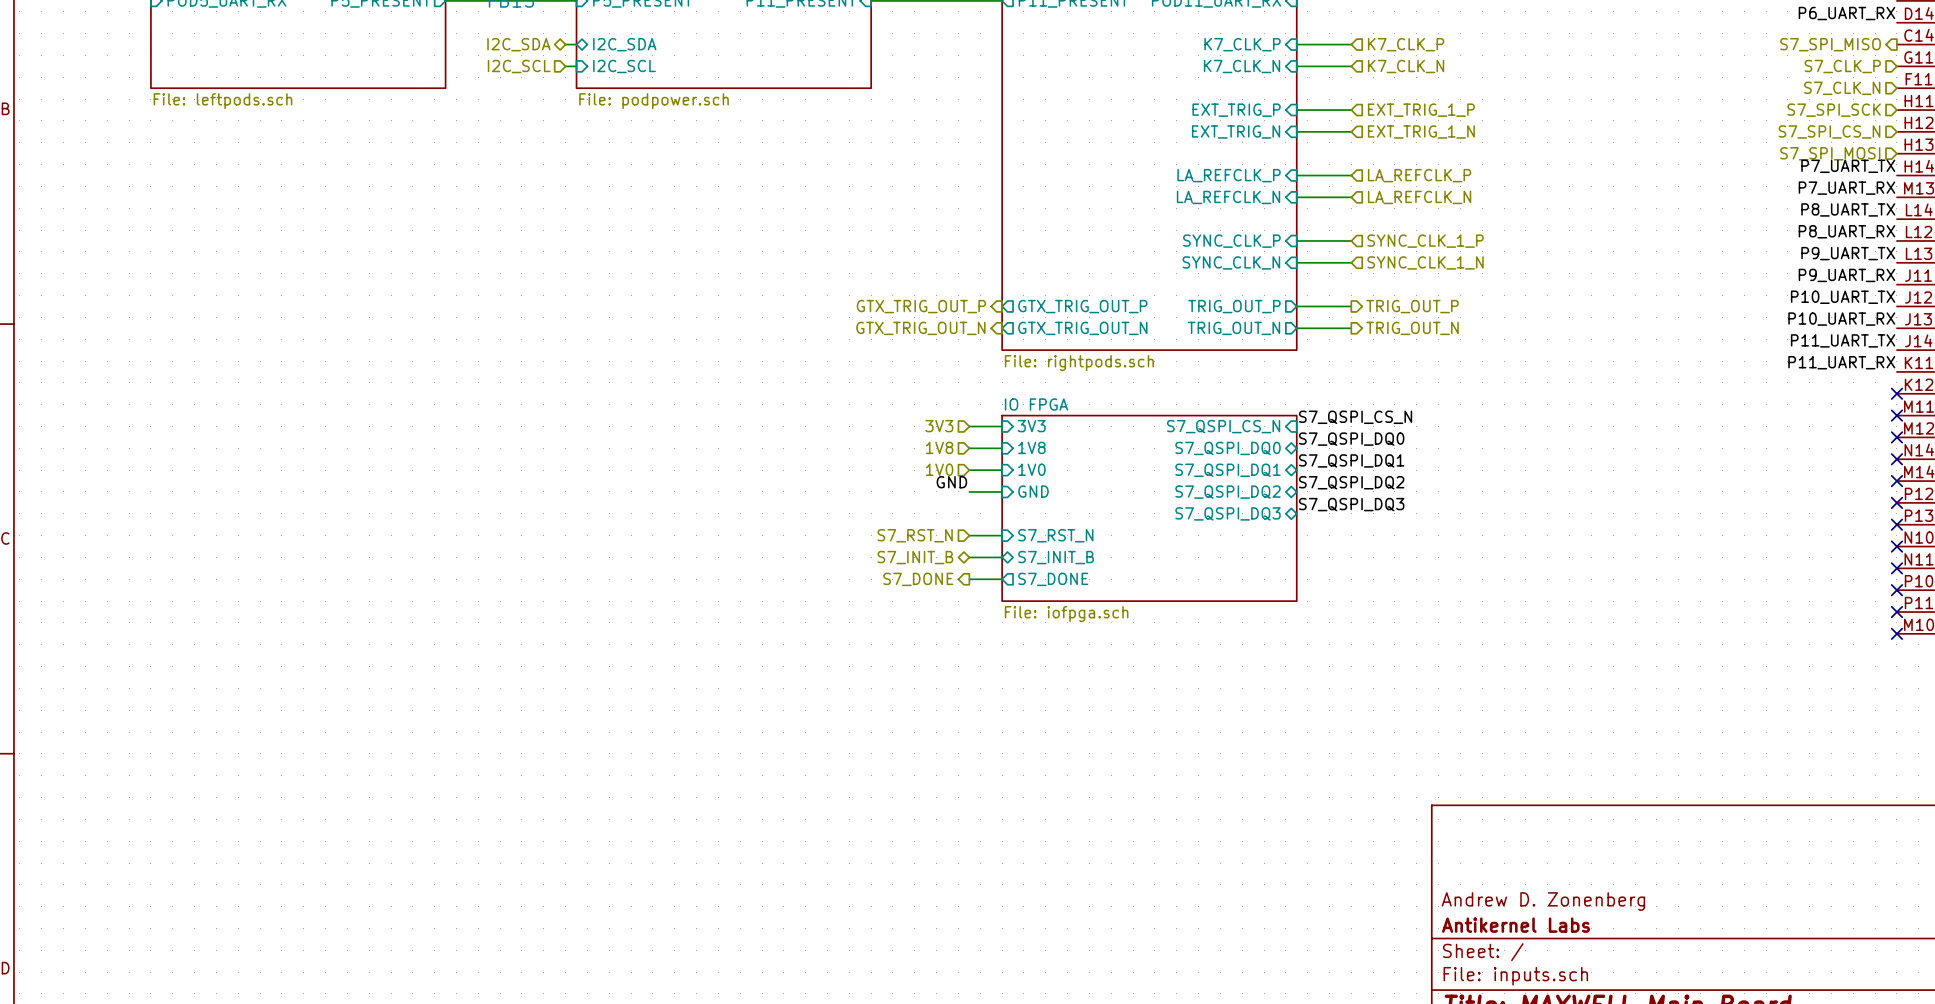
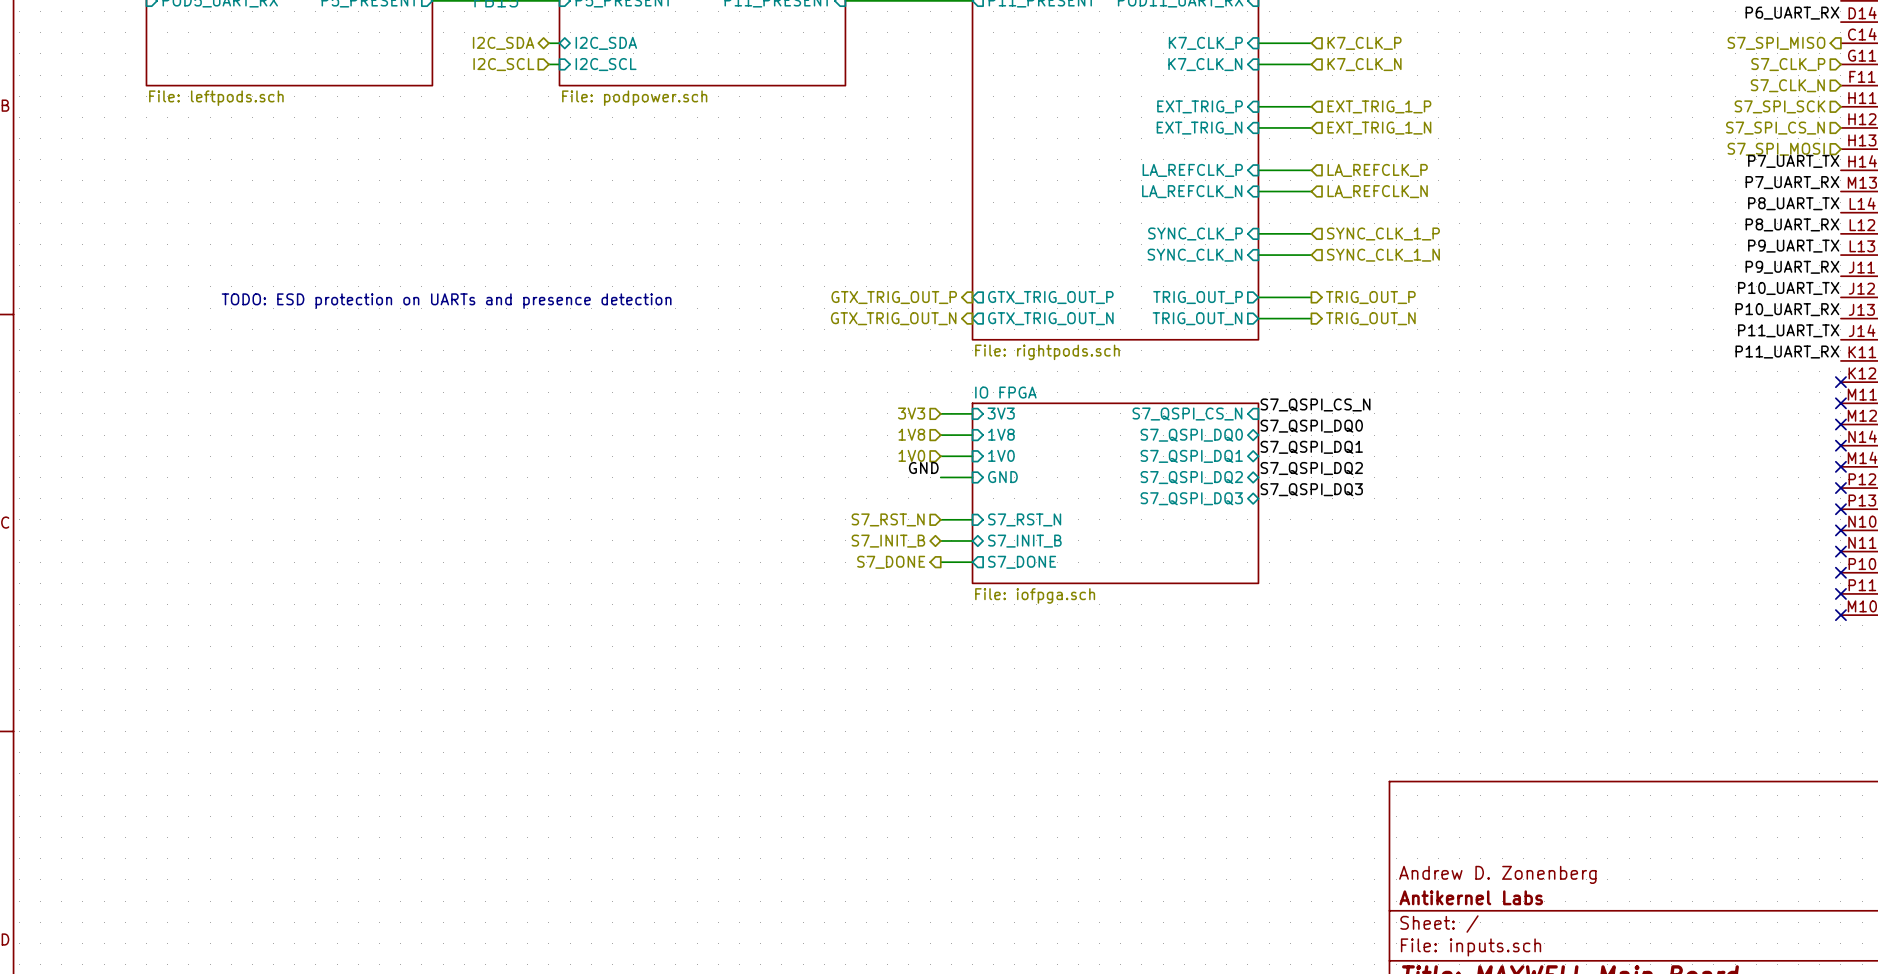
text: none -> TODO: ESD protection on UARTs and presence detection (446, 301)

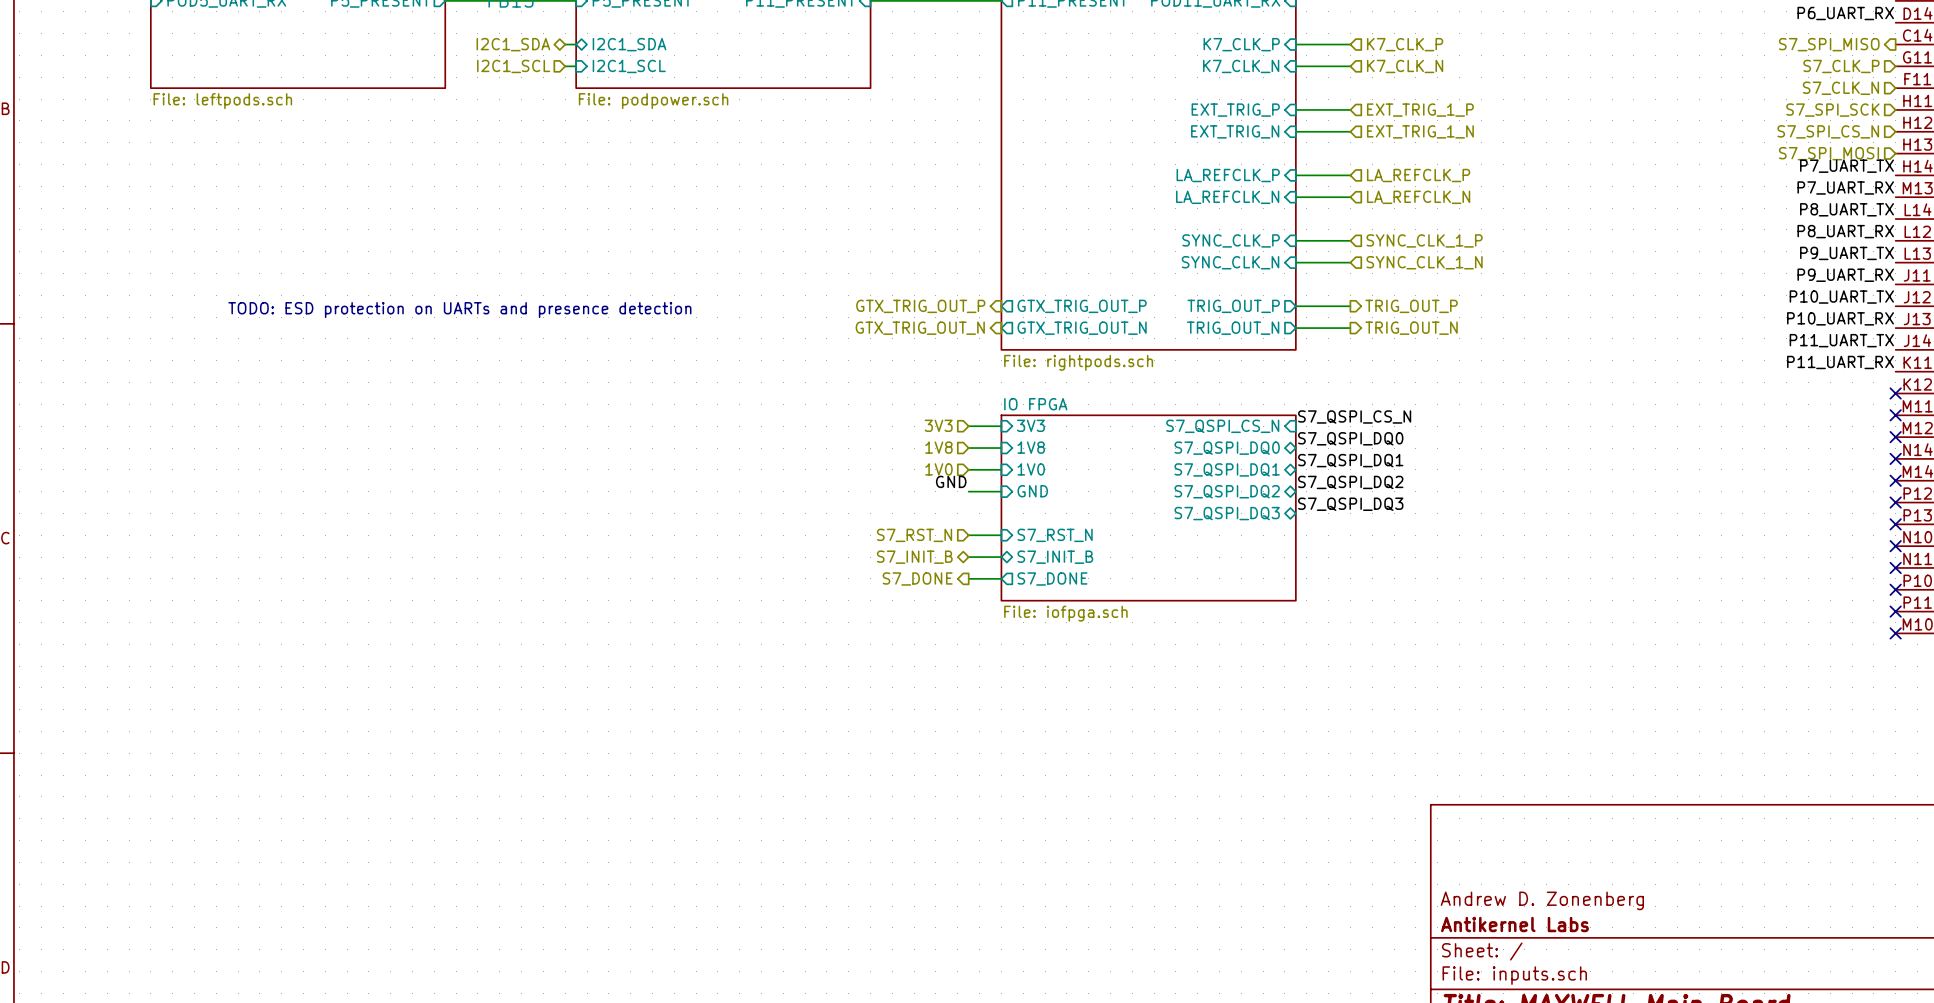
hierarchical label: I2C_SDA (503, 43) -> I2C1_SDA (513, 44)
sheet pin: I2C_SDA (606, 43) -> I2C1_SDA (629, 44)
hierarchical label: I2C_SCL (503, 64) -> I2C1_SCL (513, 66)
sheet pin: I2C_SCL (606, 64) -> I2C1_SCL (629, 66)

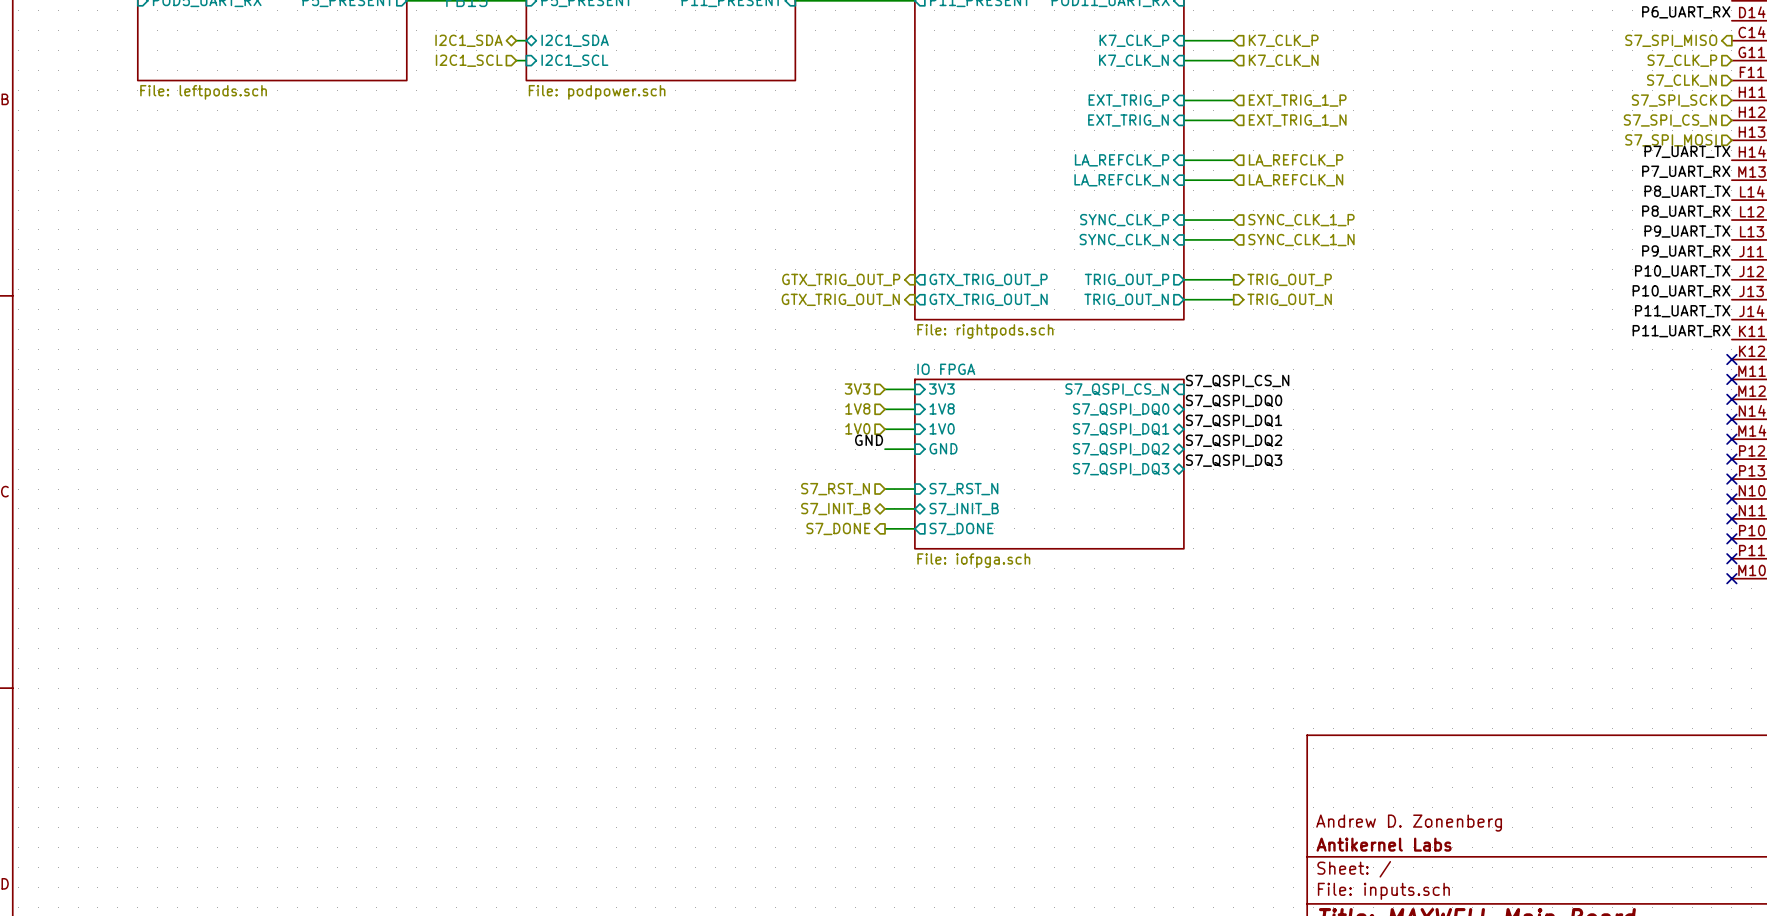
text: TODO: ESD protection on UARTs and presence detection (459, 310) -> none

